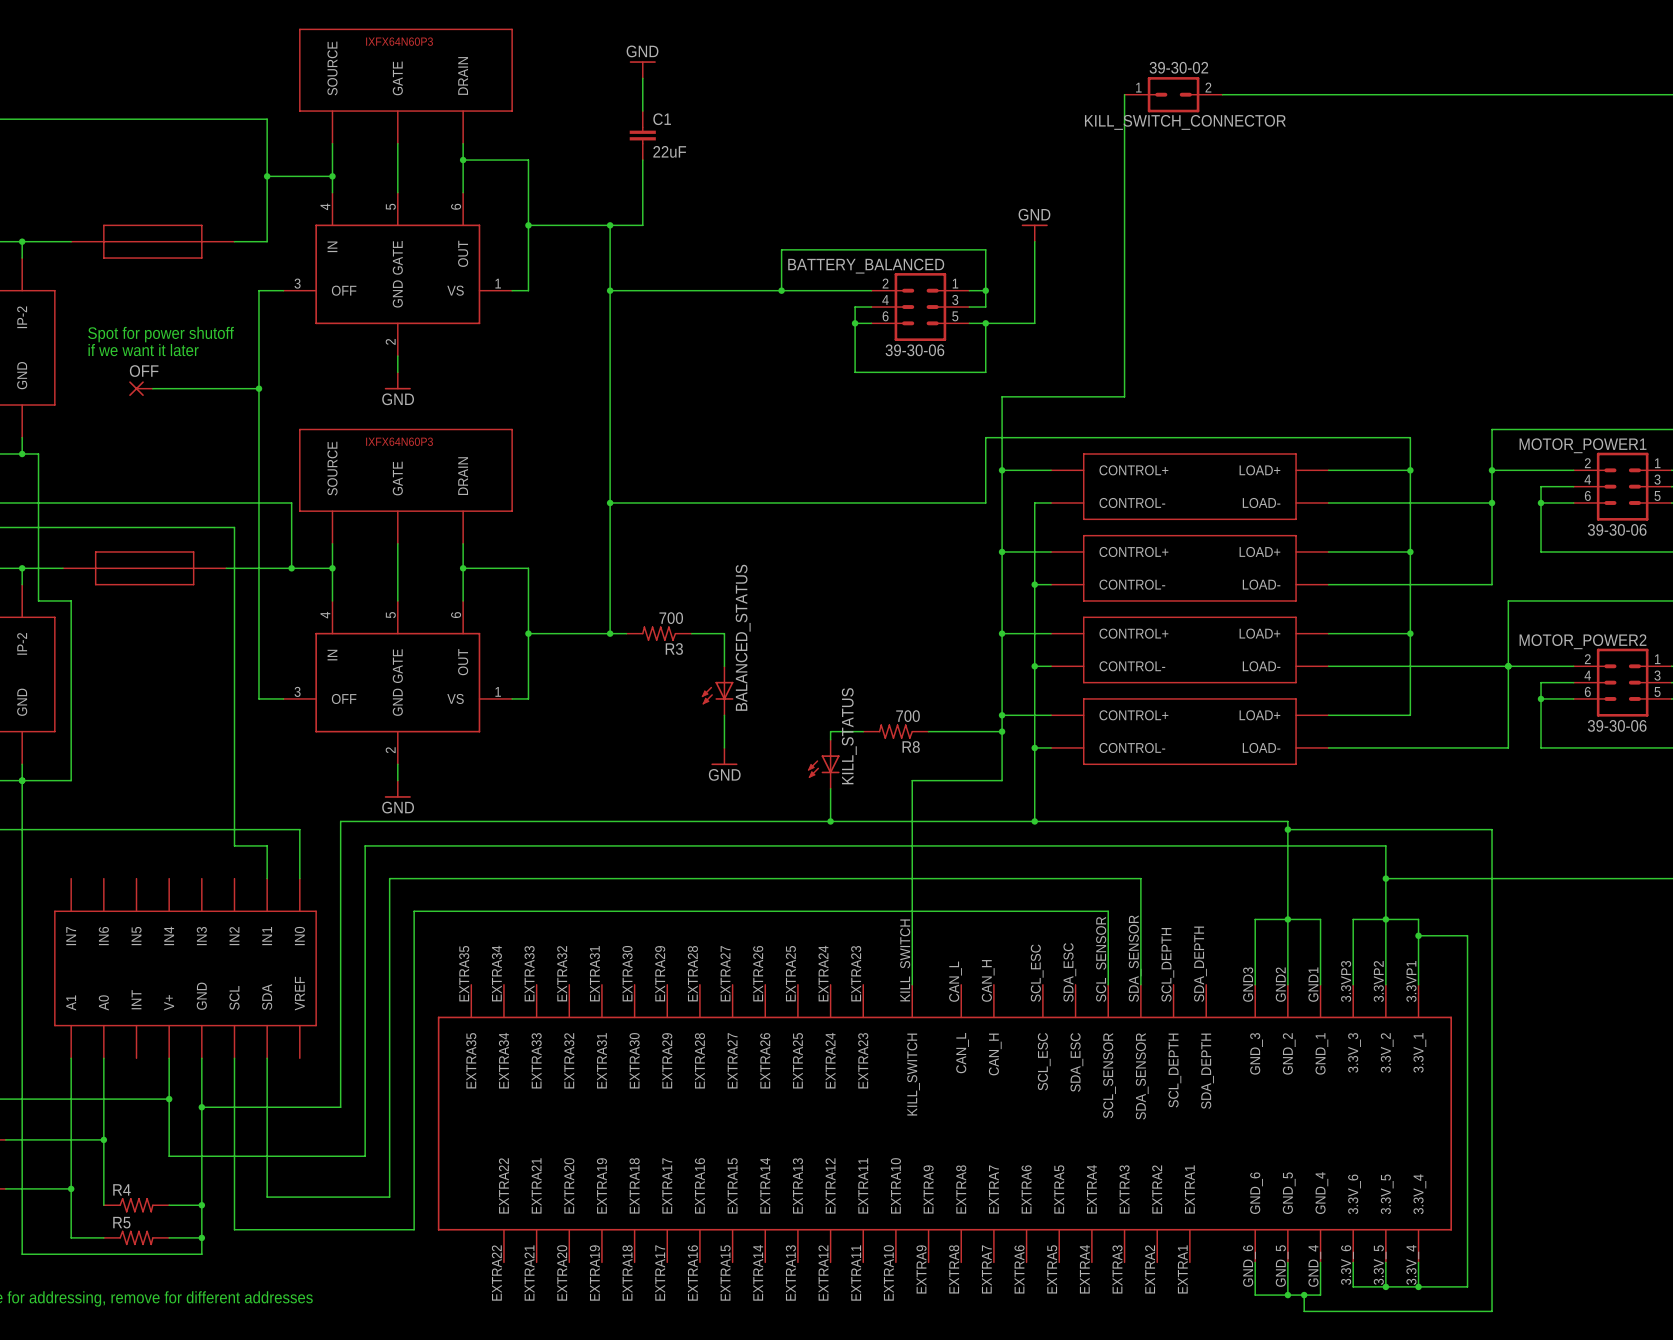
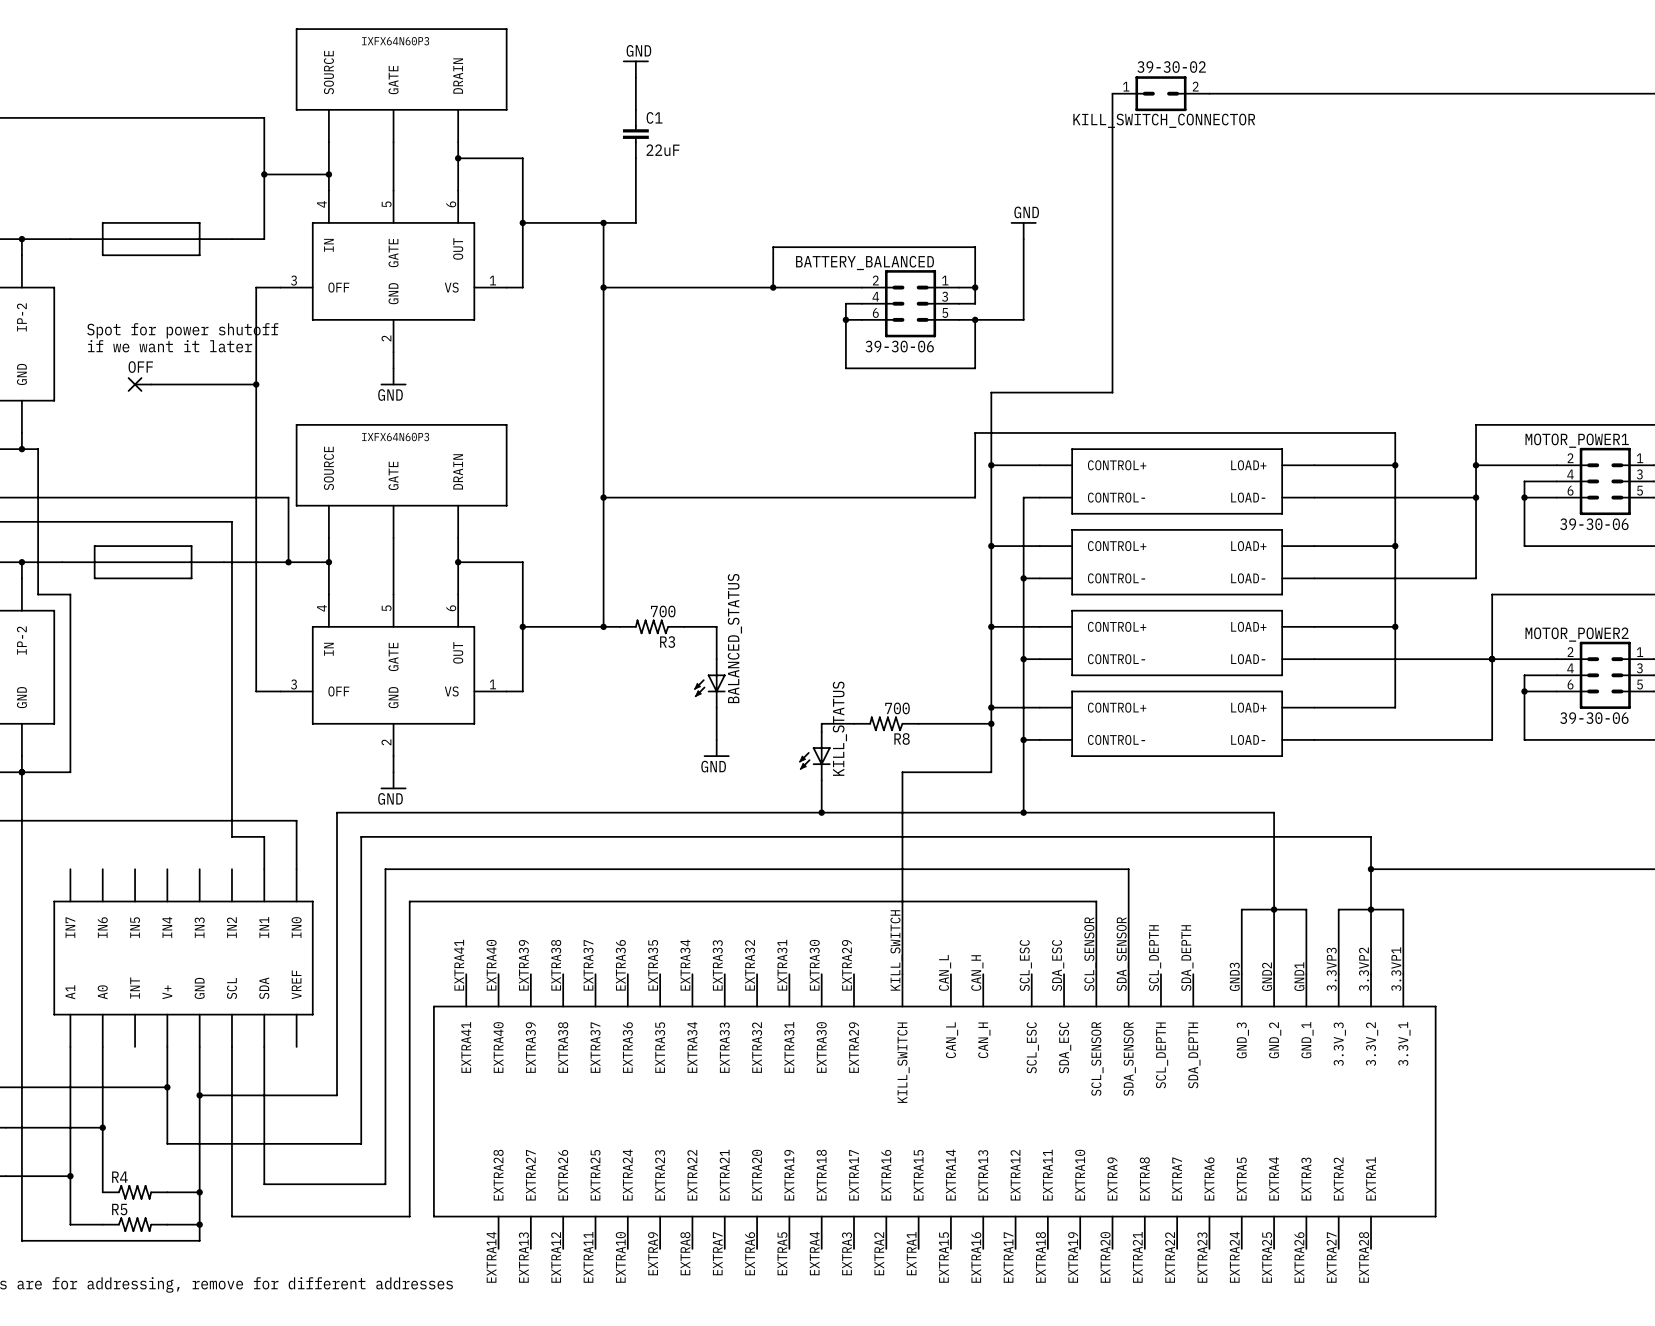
wire: (1287, 829) (1492, 829) (1492, 1311) (1304, 1311) (1304, 1295) -> none
junction: (1287, 829) -> none
wire: (1418, 935) (1467, 935) (1467, 1286) (1353, 1286) (1353, 1262) -> none
junction: (1418, 935) -> none
part symbol: [437, 984, 1453, 1263] -> [433, 974, 1437, 1249]
wire: (1255, 1262) (1255, 1295) (1320, 1295) (1320, 1262) -> none
wire: (1287, 1262) (1287, 1295) -> none
wire: (1385, 1262) (1385, 1286) -> none
wire: (1418, 1262) (1418, 1286) -> none
junction: (1385, 1286) -> none
junction: (1418, 1286) -> none
junction: (1287, 1295) -> none
junction: (1304, 1295) -> none

